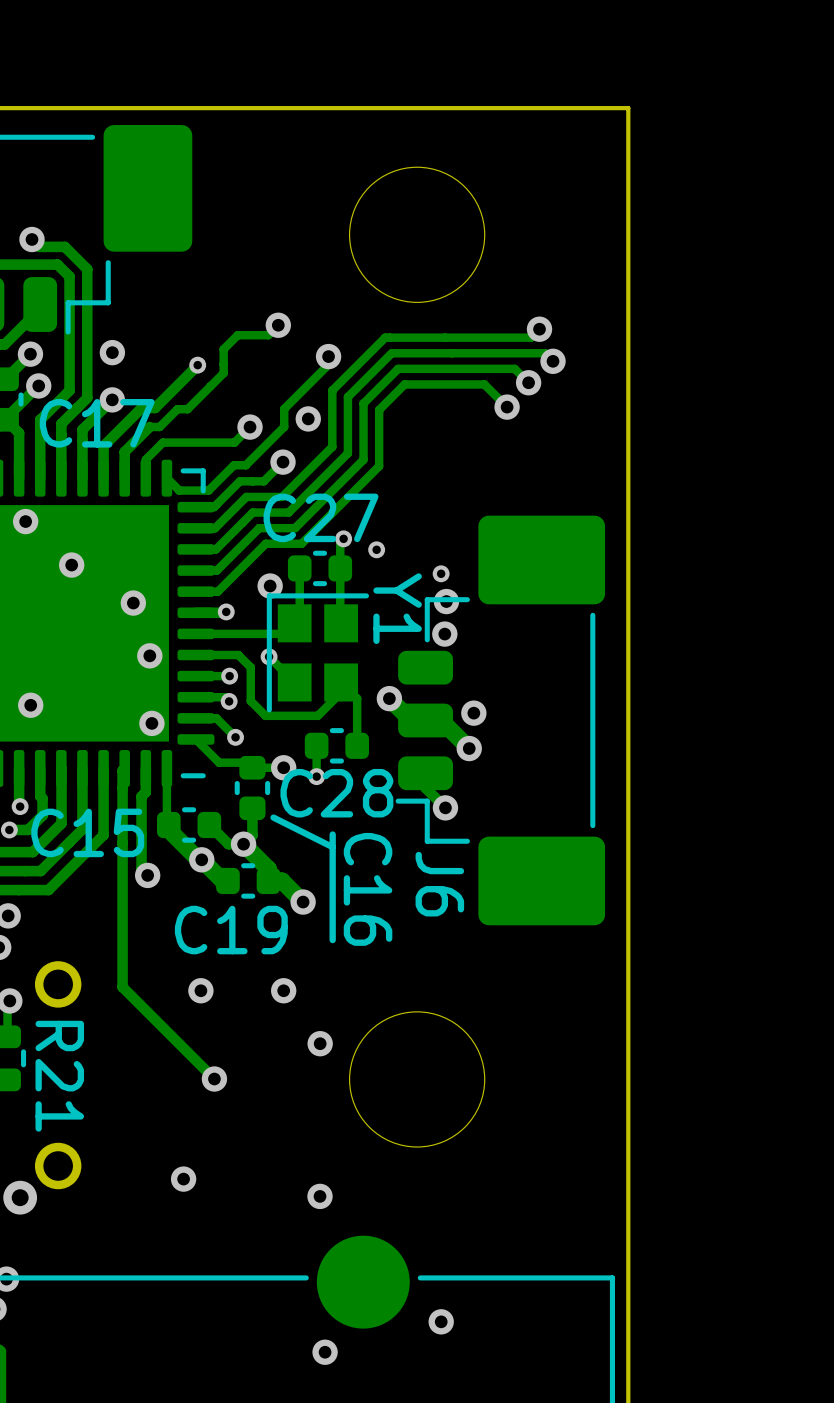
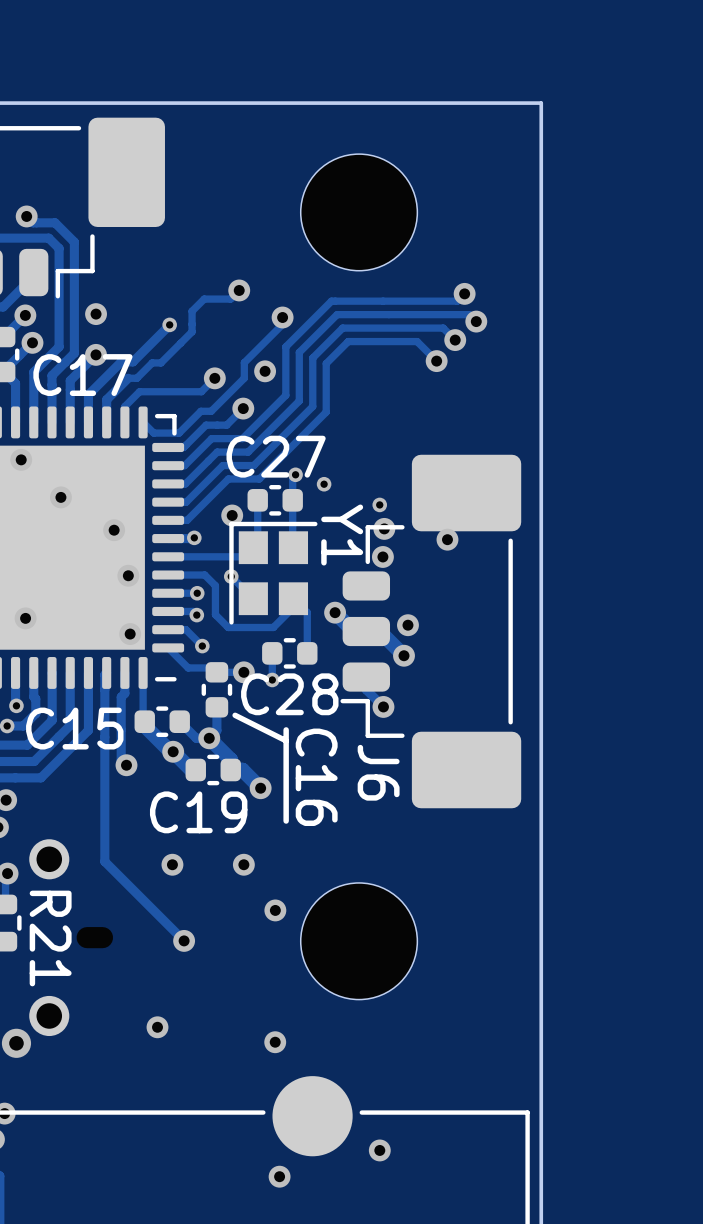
via: none -> (447, 539)

